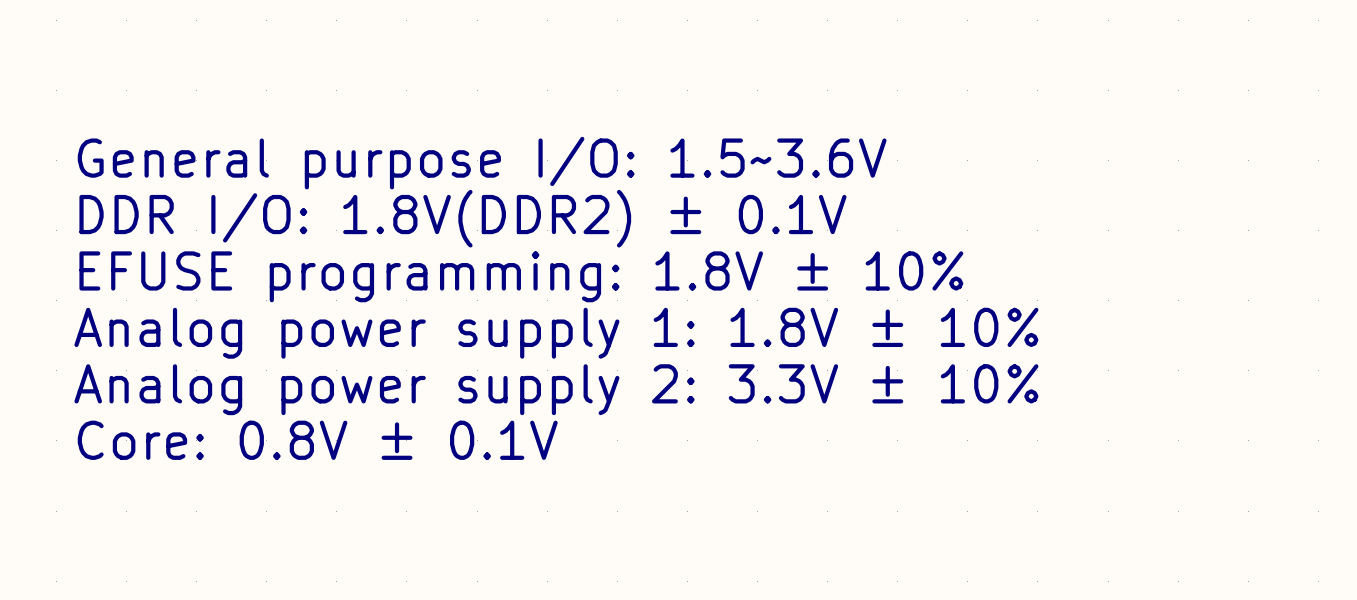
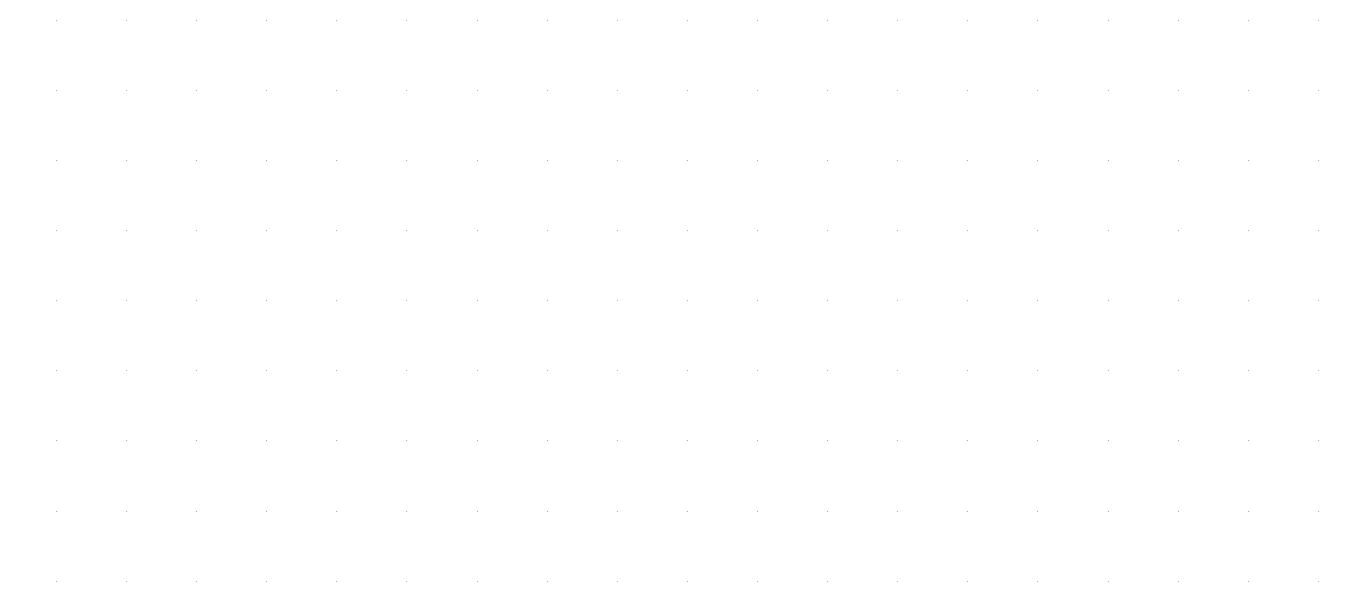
text: General purpose I/O: 1.5~3.6V (482, 163) -> none
text: DDR I/O: 1.8V(DDR2) ± 0.1V (462, 218) -> none
text: EFUSE programming: 1.8V ± 10% (521, 276) -> none
text: Analog power supply 1: 1.8V ± 10% (556, 333) -> none
text: Analog power supply 2: 3.3V ± 10% (556, 389) -> none
text: Core: 0.8V ± 0.1V (317, 440) -> none

